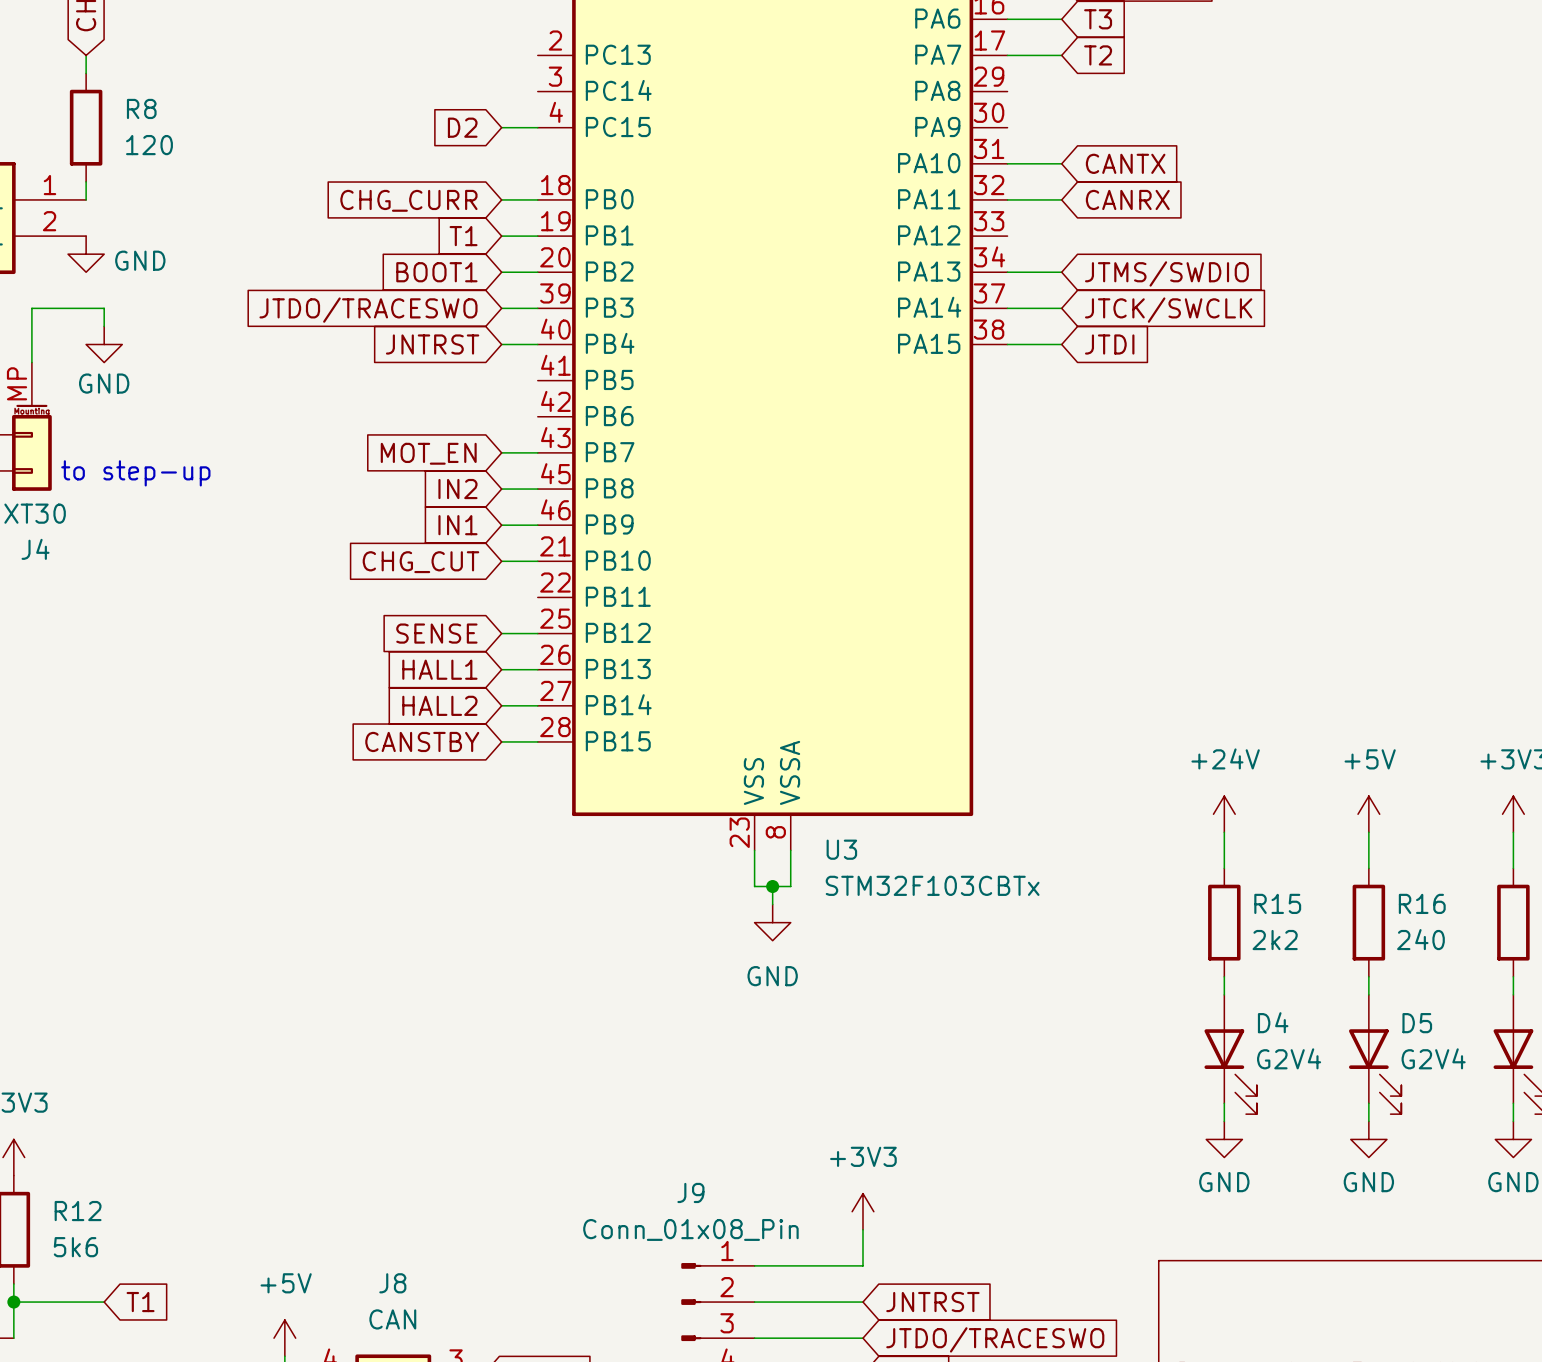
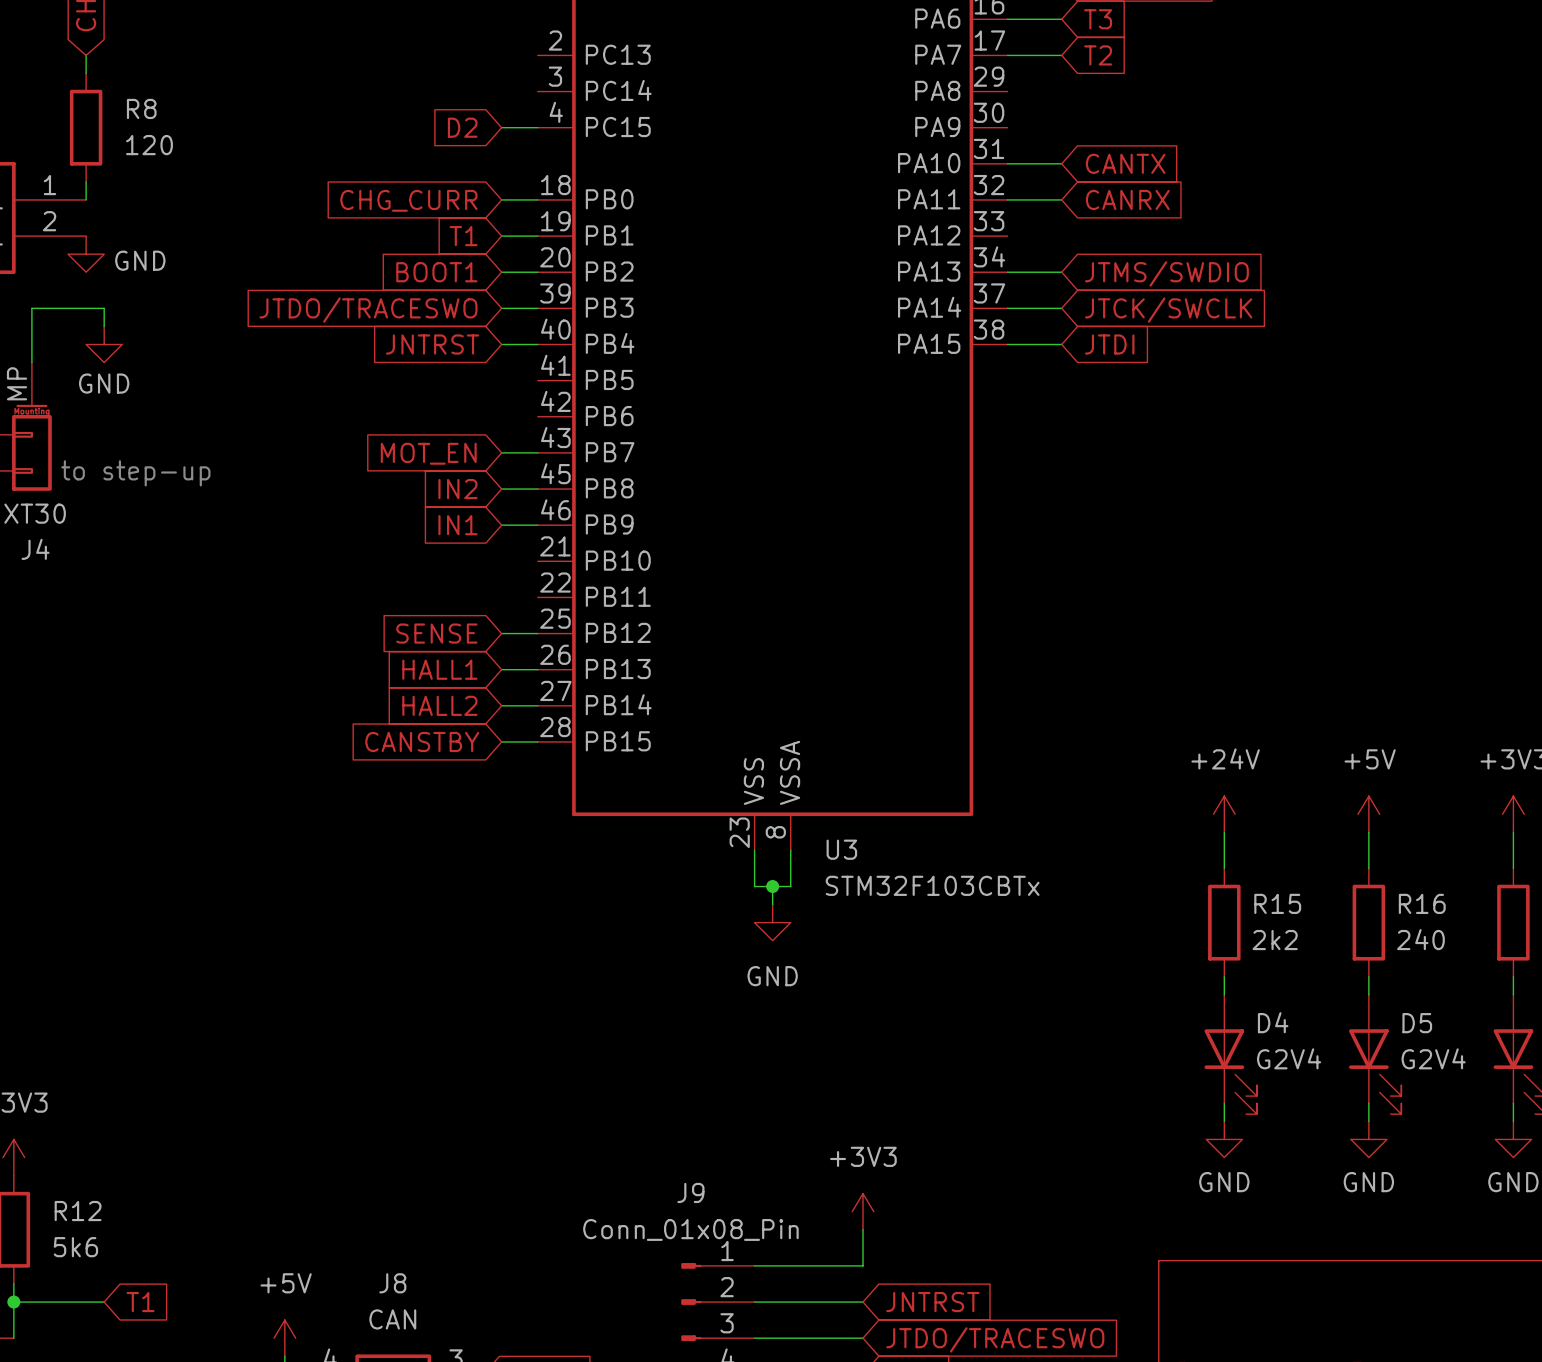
wire: (501, 561) (537, 561) -> none
global label: CHG_CUT (420, 562) -> none

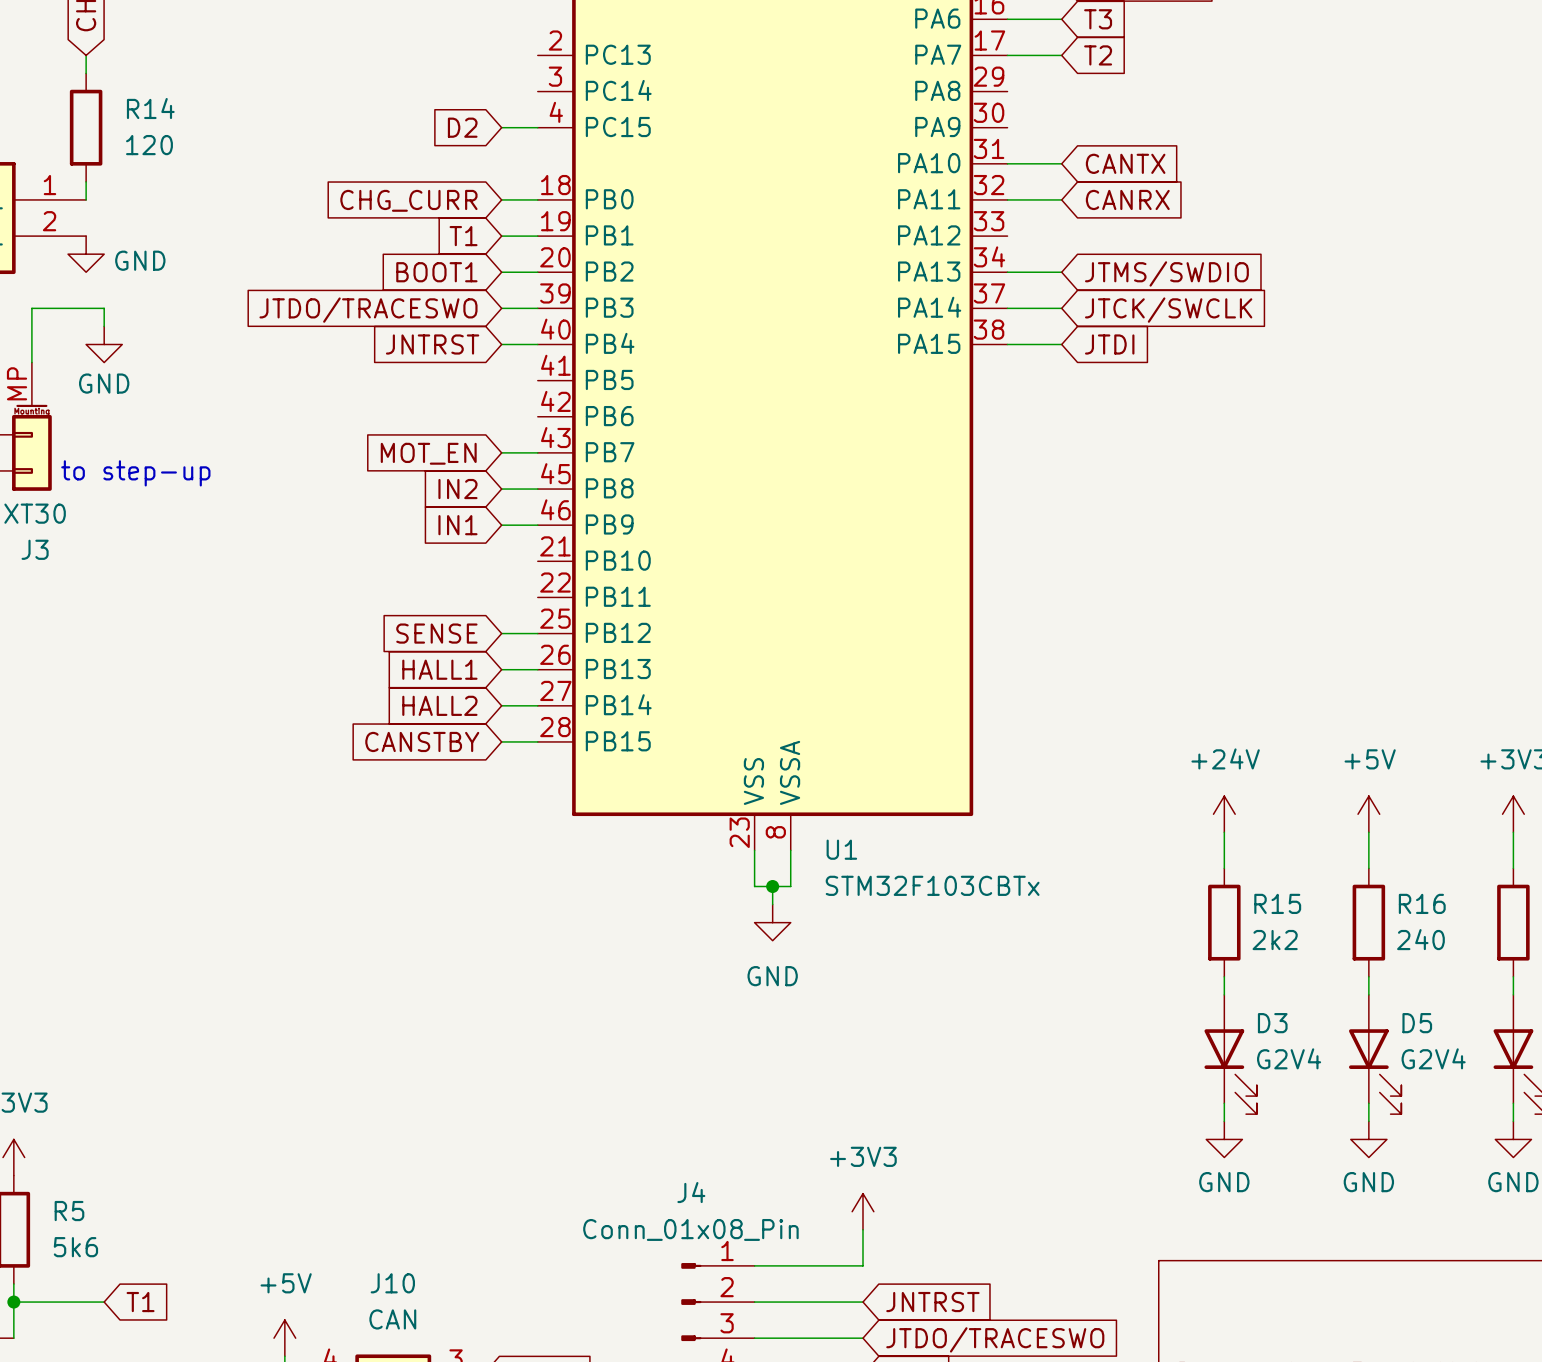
R8 name: R8 (141, 108) -> R14 (150, 108)
J4 name: J4 (35, 549) -> J3 (35, 549)
U3 name: U3 (841, 849) -> U1 (841, 849)
D4 name: D4 (1273, 1022) -> D3 (1272, 1023)
J9 name: J9 (690, 1192) -> J4 (691, 1192)
R12 name: R12 (78, 1211) -> R5 (69, 1211)
J8 name: J8 (392, 1283) -> J10 (392, 1283)

